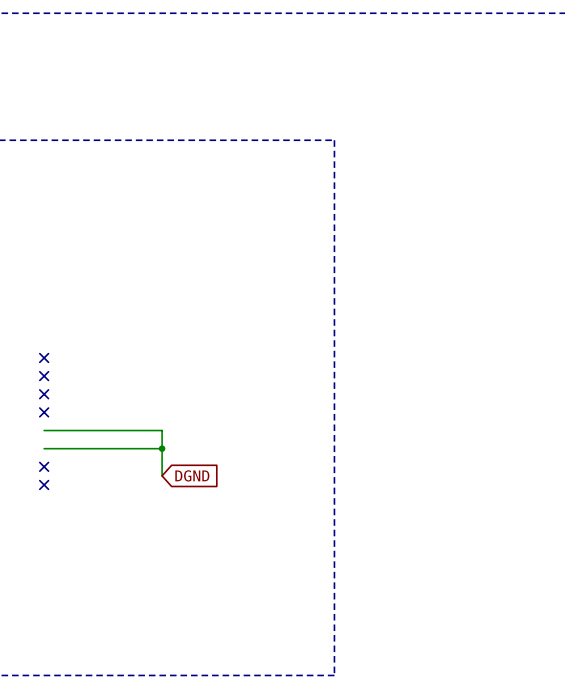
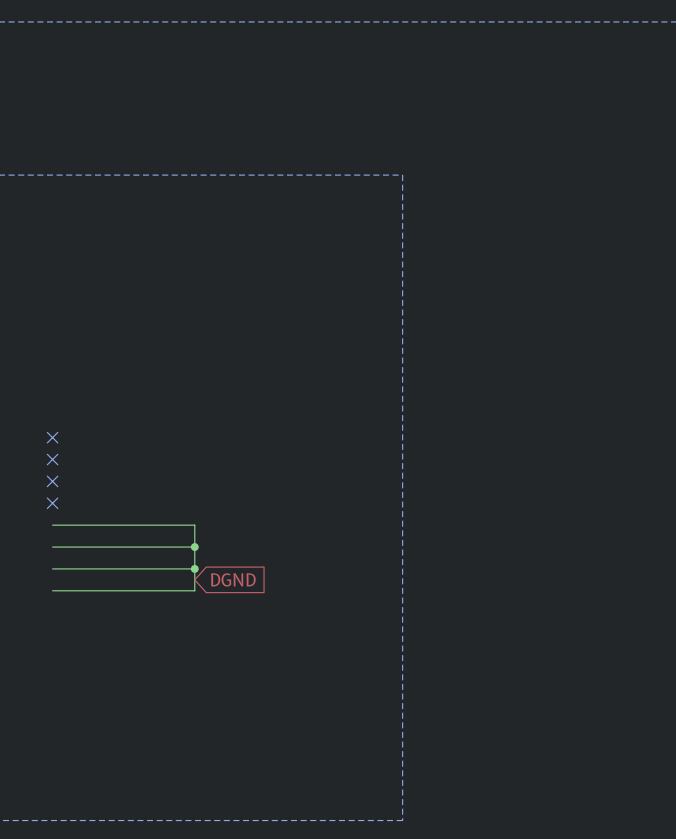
wire: none -> (52, 568) (194, 568)
no-connect mark: (44, 466) -> none
junction: none -> (194, 568)
wire: none -> (194, 579) (194, 590) (52, 590)
no-connect mark: (44, 484) -> none

